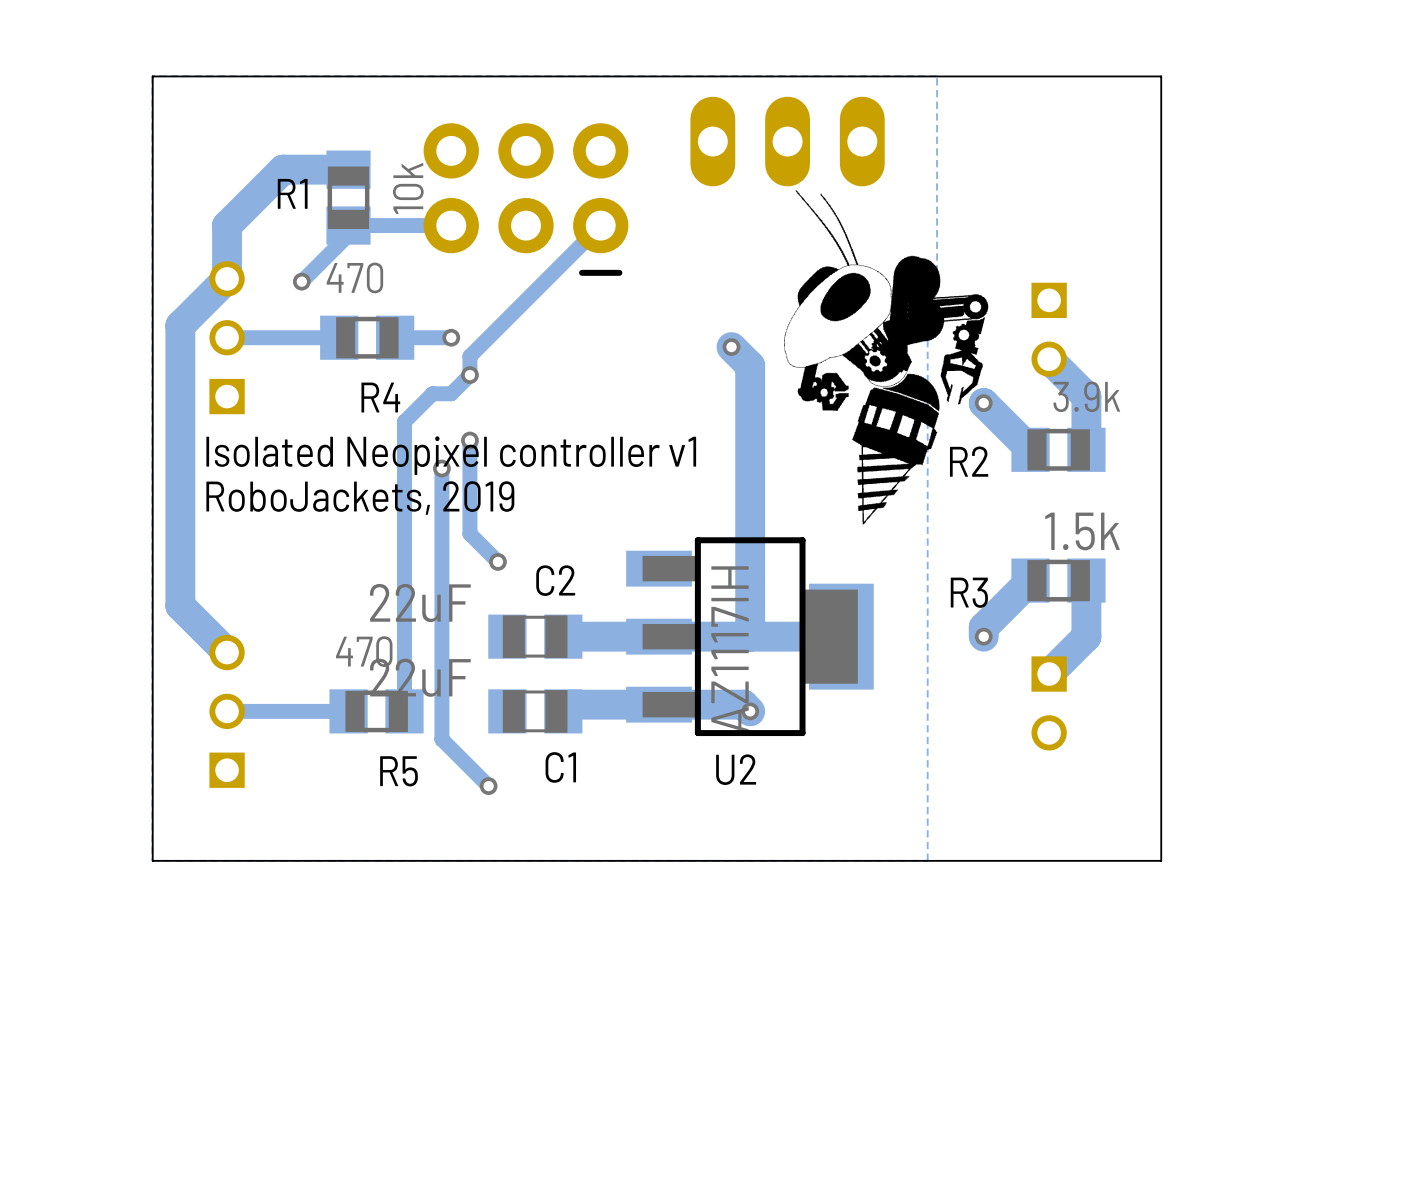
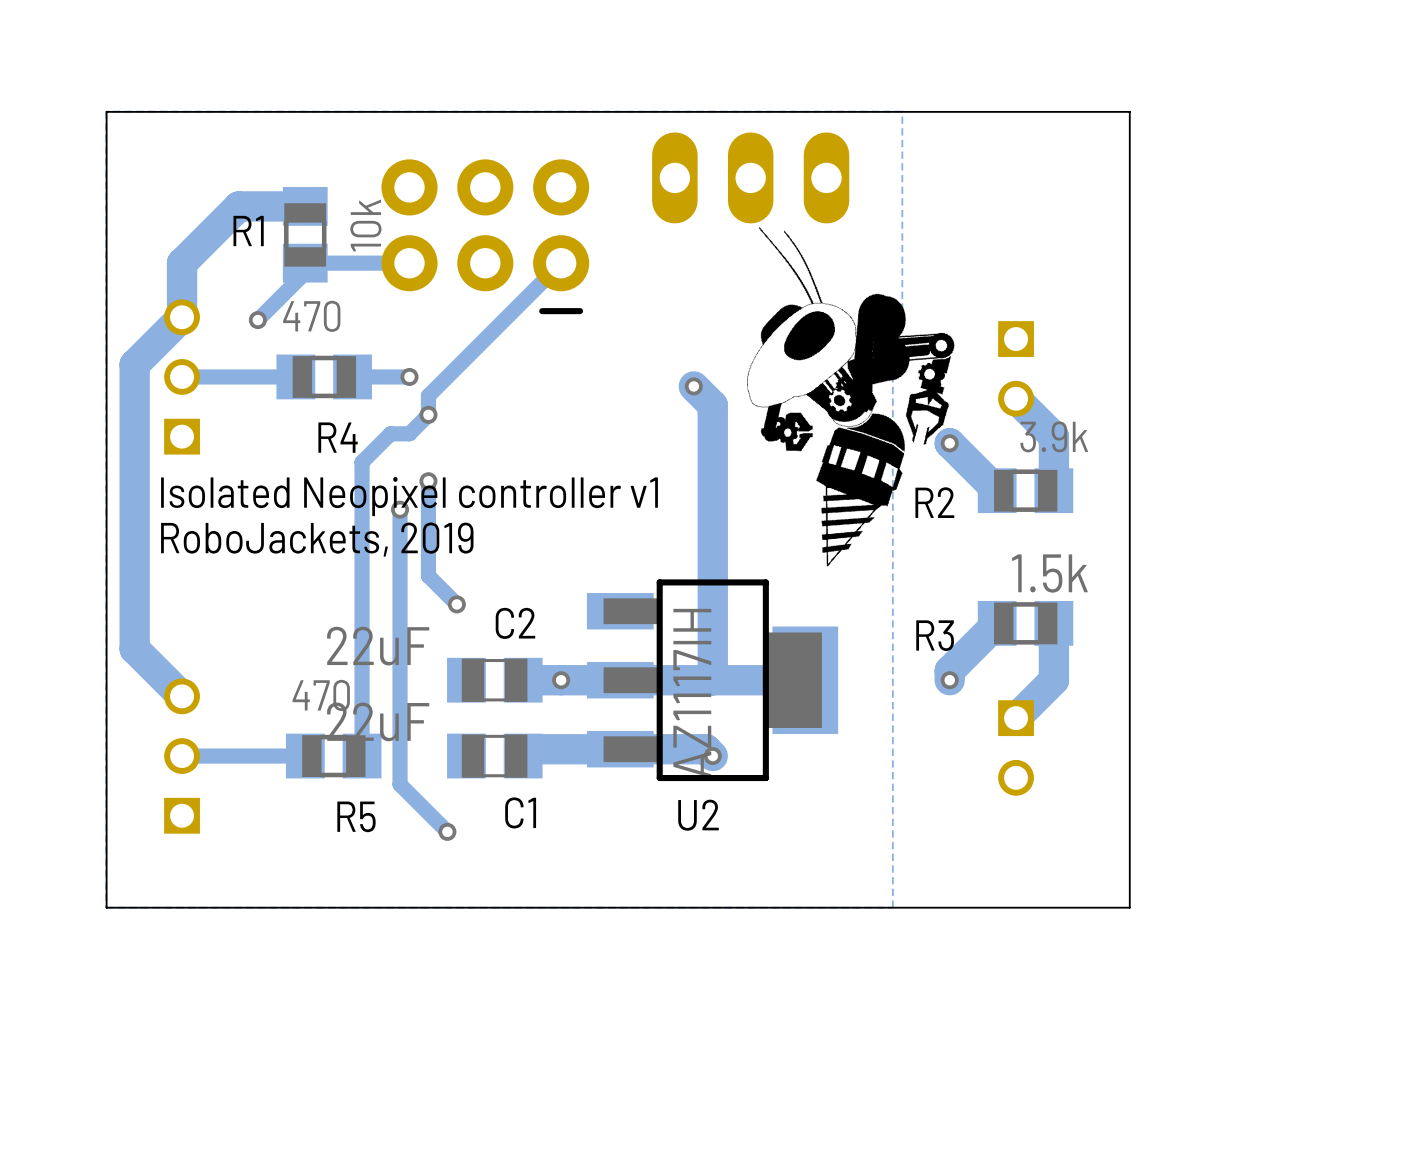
via: none -> (561, 680)

